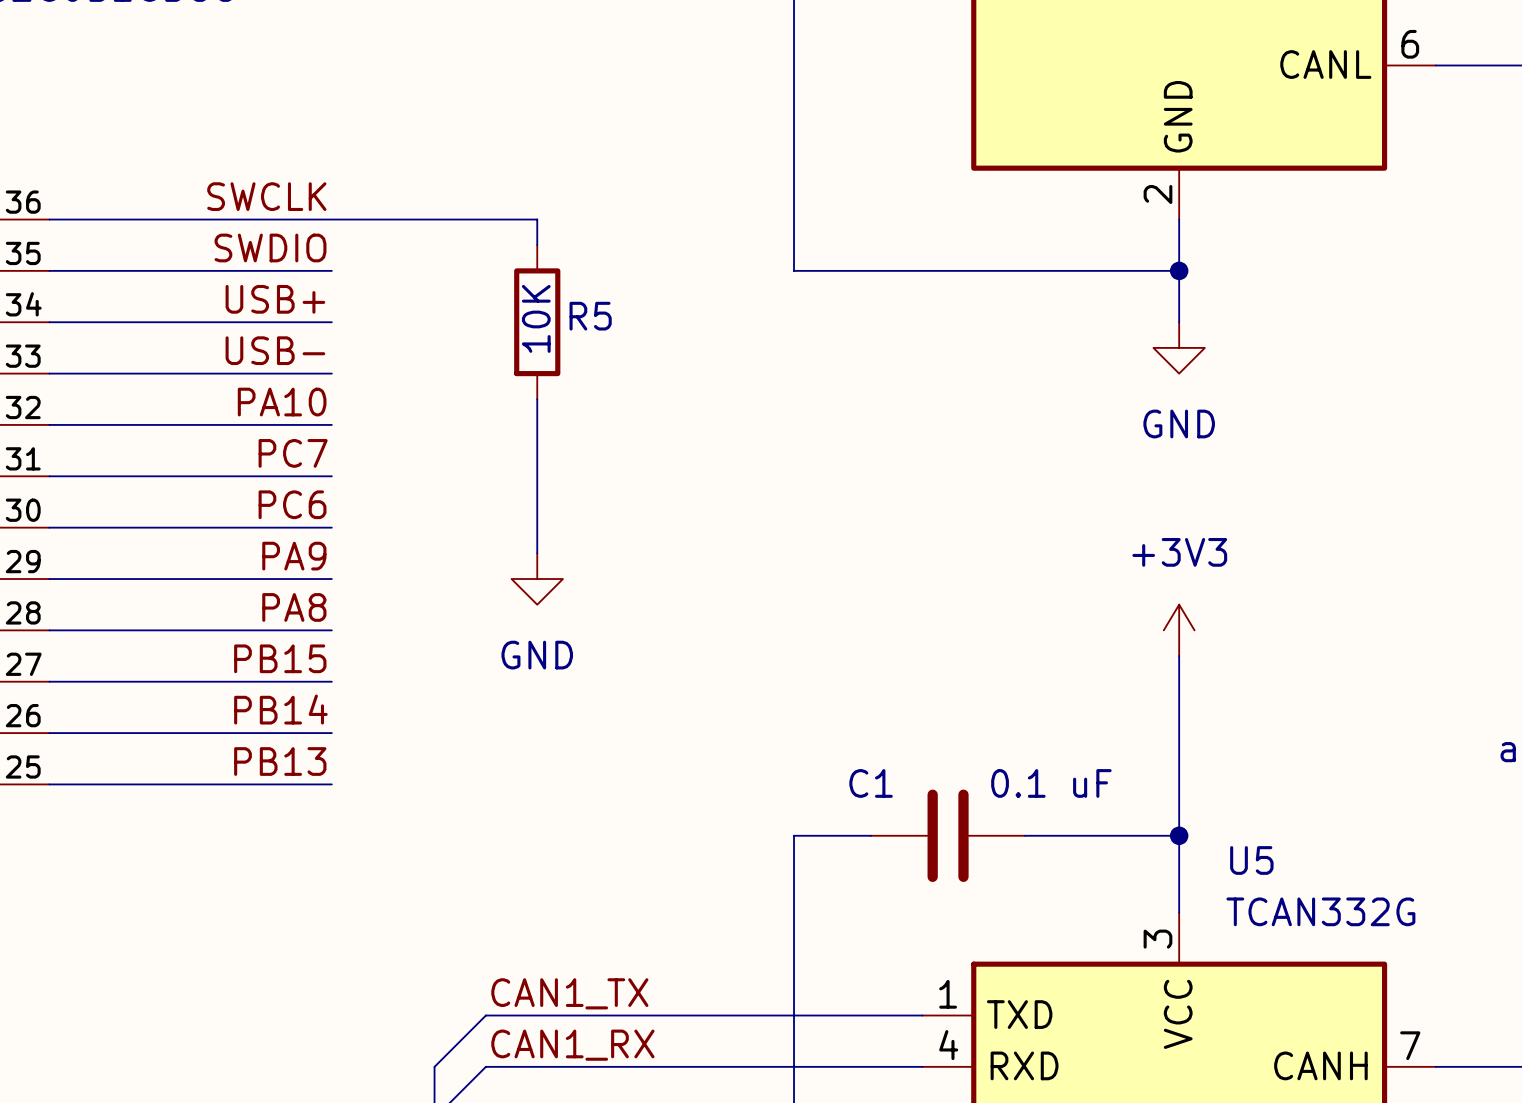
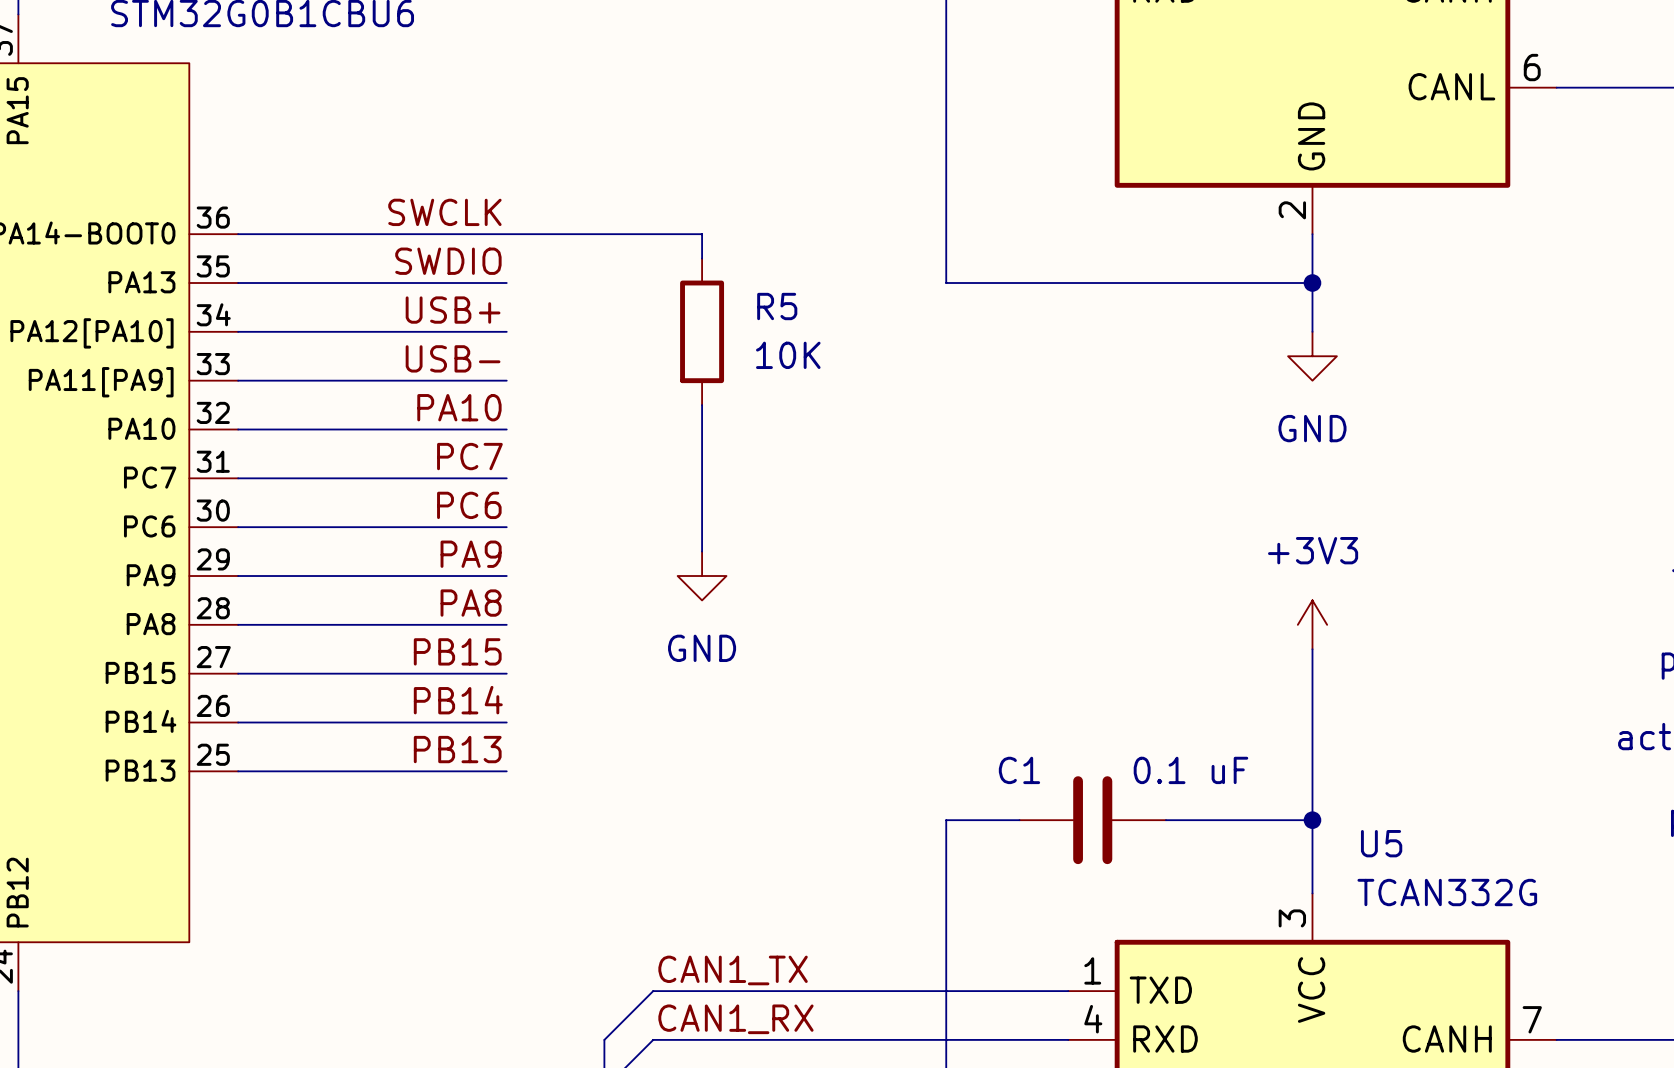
R5 name position: R5 (590, 316) -> R5 (777, 306)
R5 value rotation: 0° (536, 318) -> 90° clockwise (788, 355)
R5 value position: 10K (536, 318) -> 10K (788, 355)

